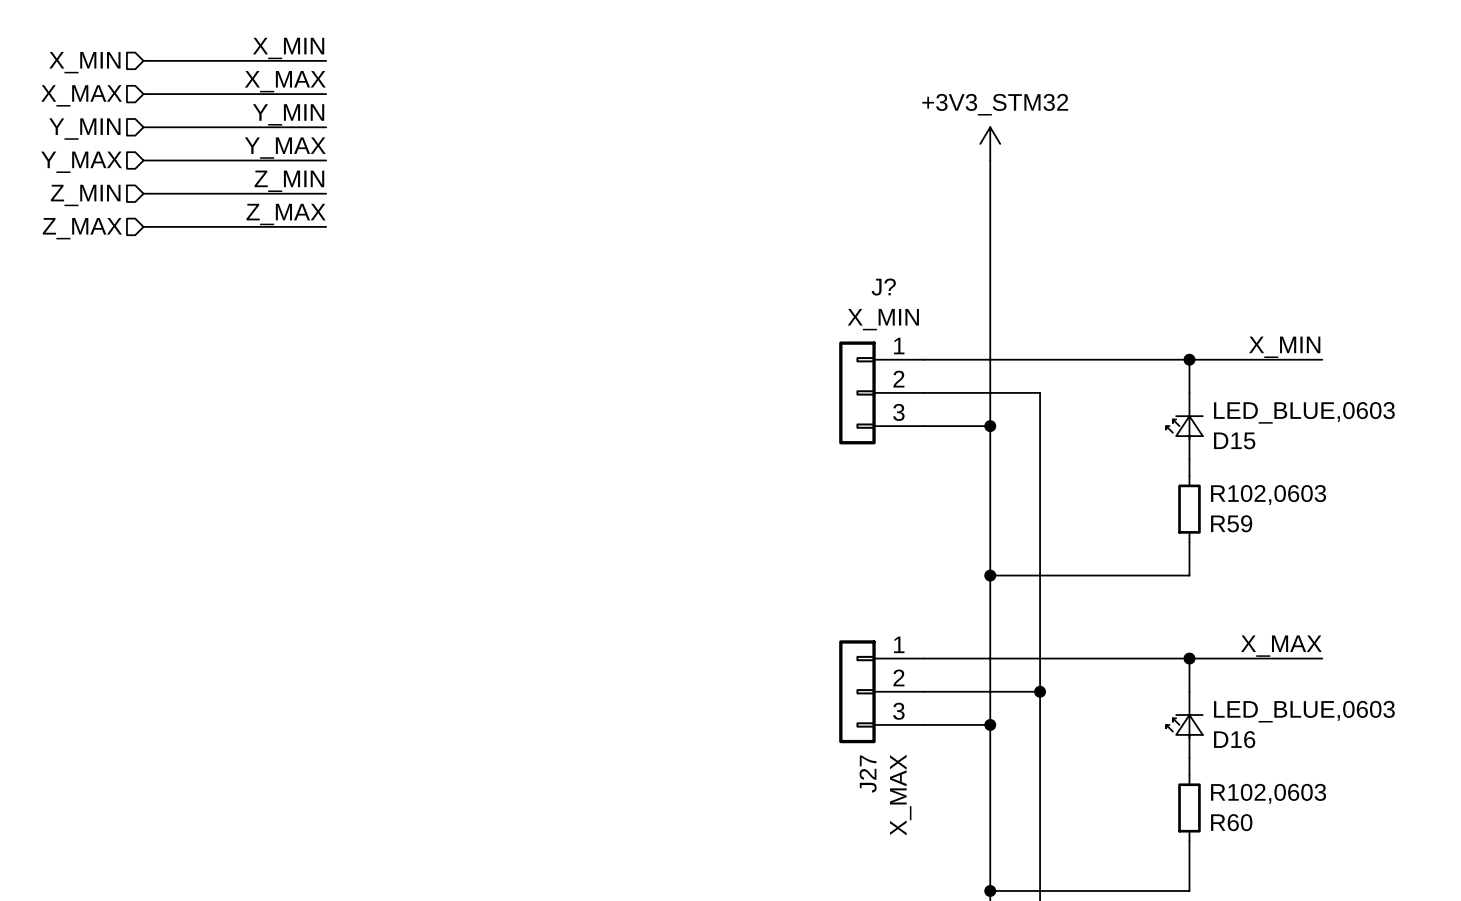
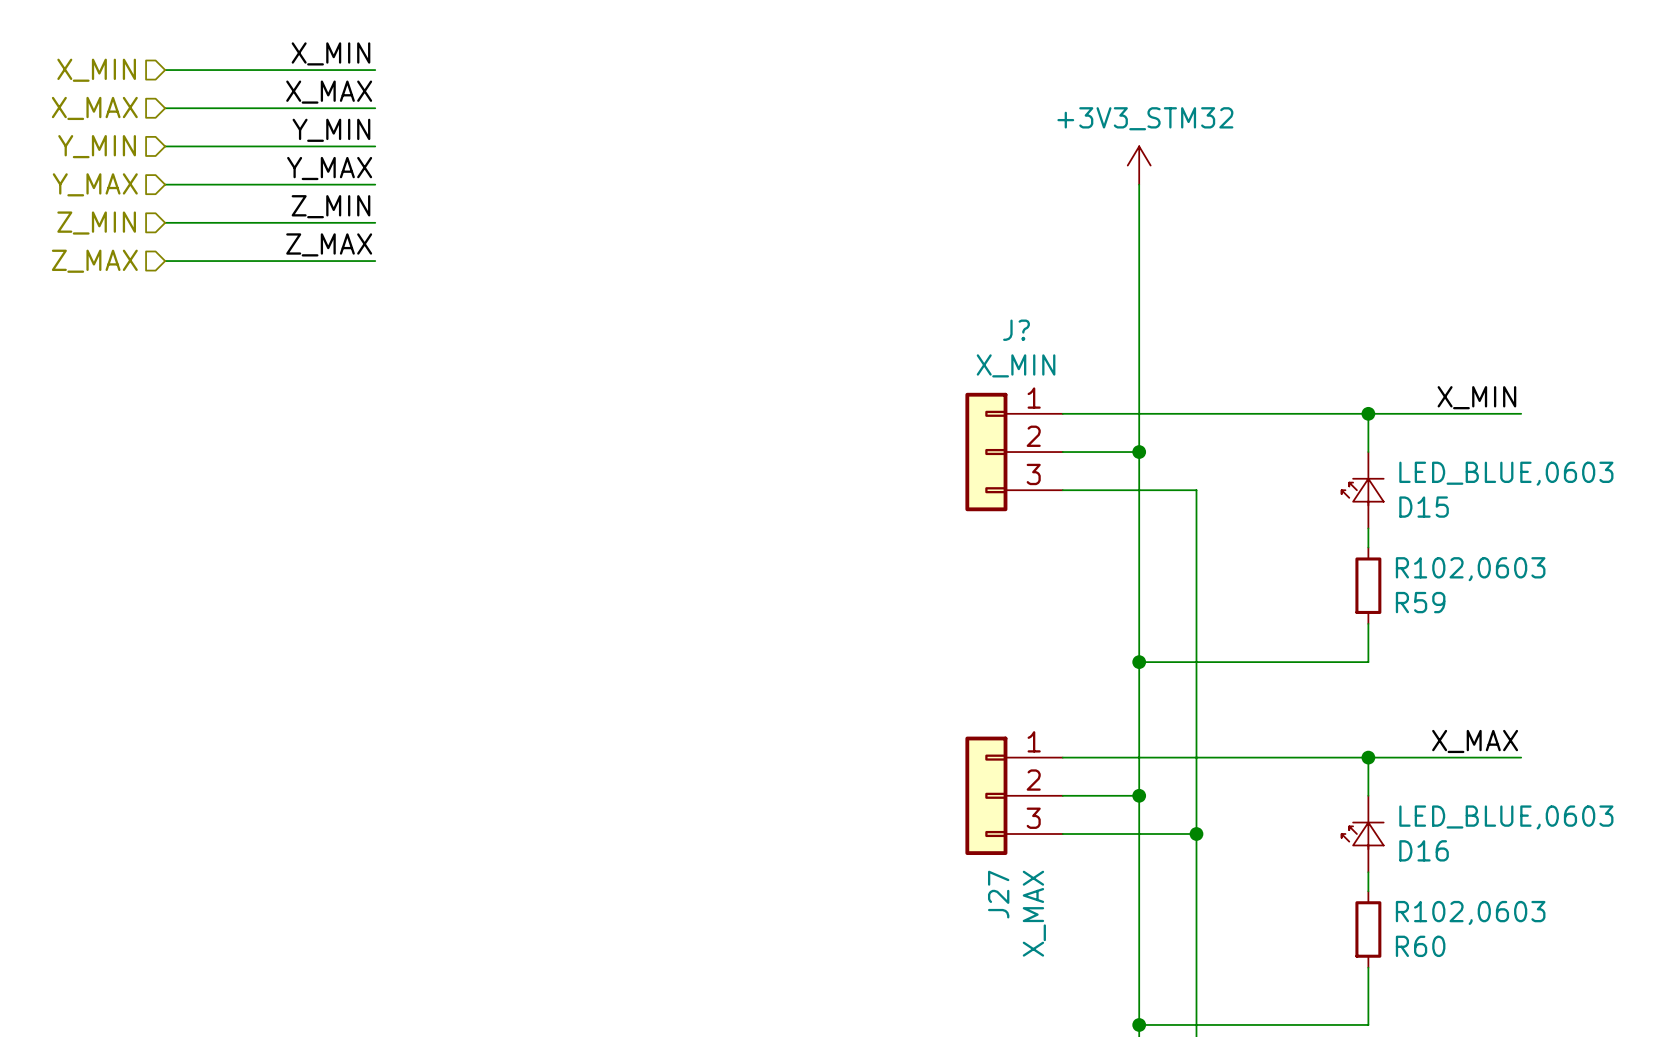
wire: (990, 392) (1040, 392) (1040, 426) -> (1139, 490) (1196, 490)
junction position: (990, 426) -> (1139, 452)
wire: (990, 691) (1040, 691) -> (1139, 834) (1196, 834)
junction: none -> (1139, 795)
junction: (1040, 691) -> none
junction: (990, 724) -> none
junction: none -> (1196, 834)

